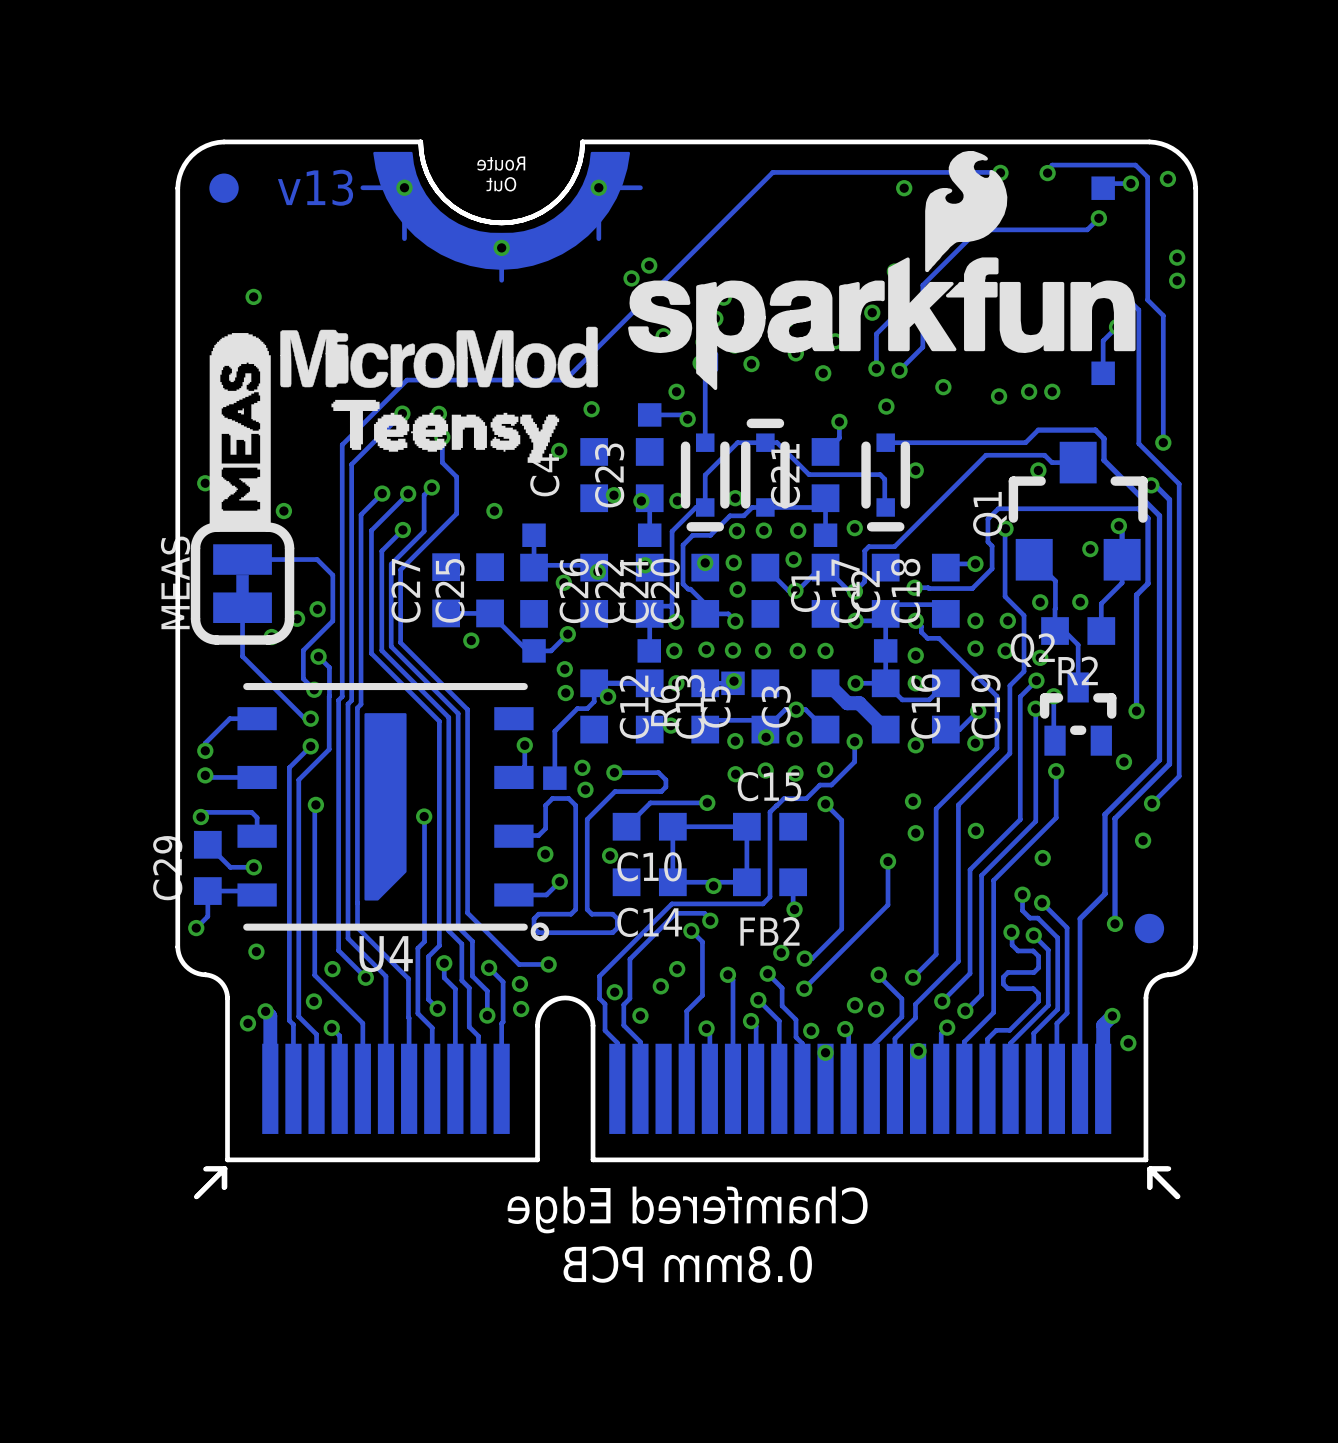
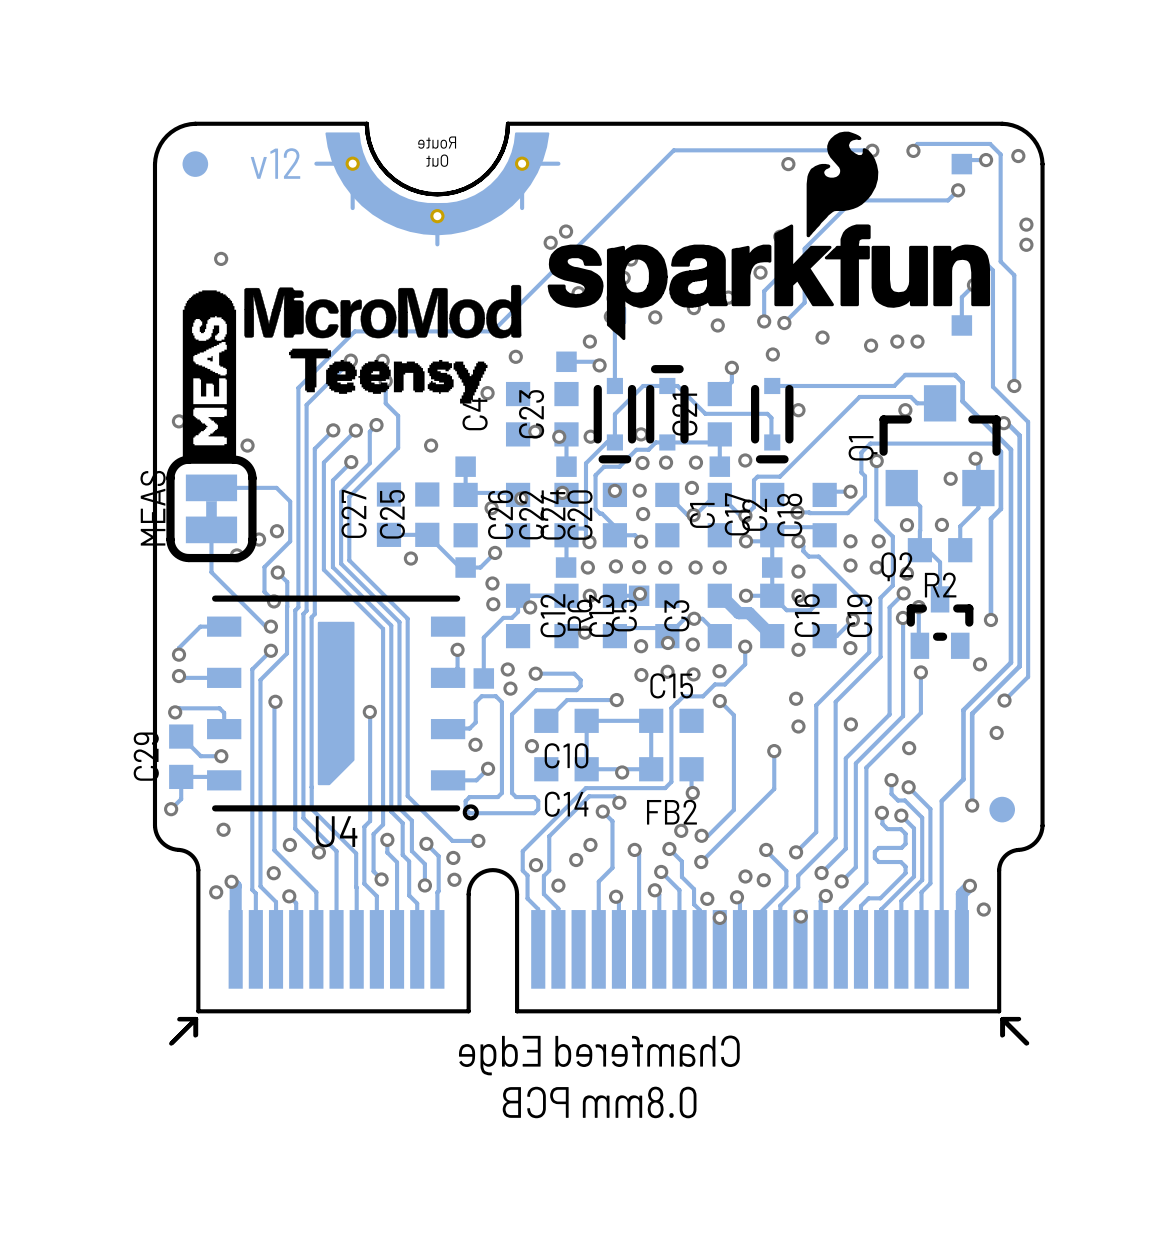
text: v13 (315, 187) -> v12 (275, 163)

